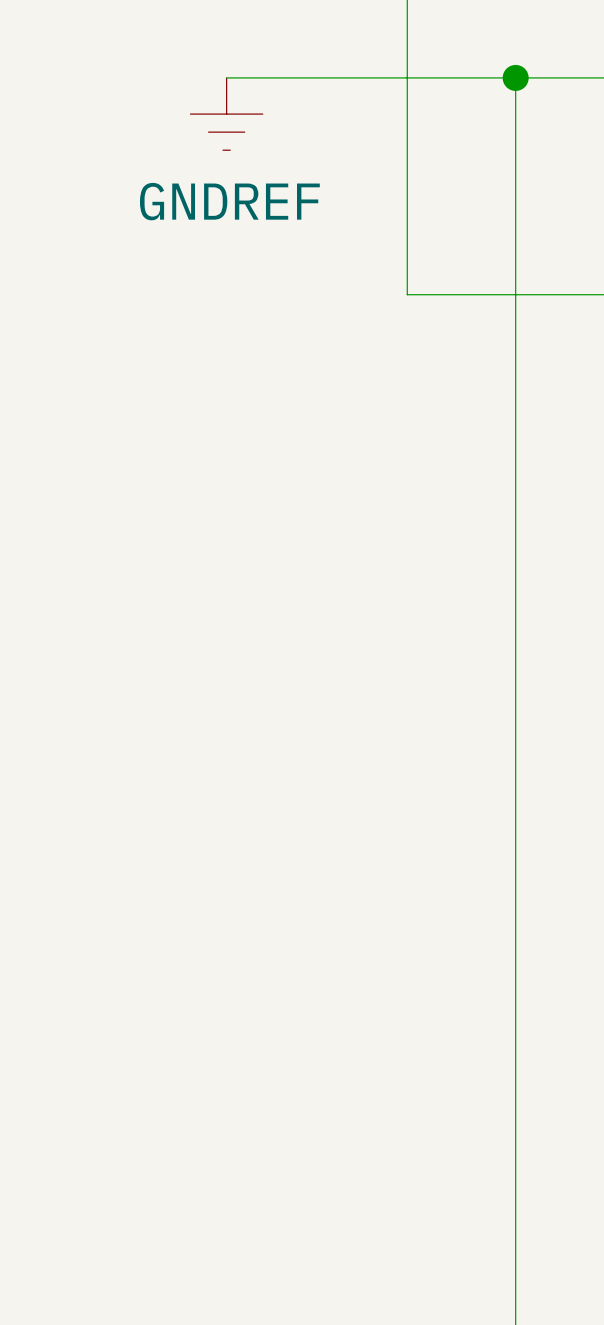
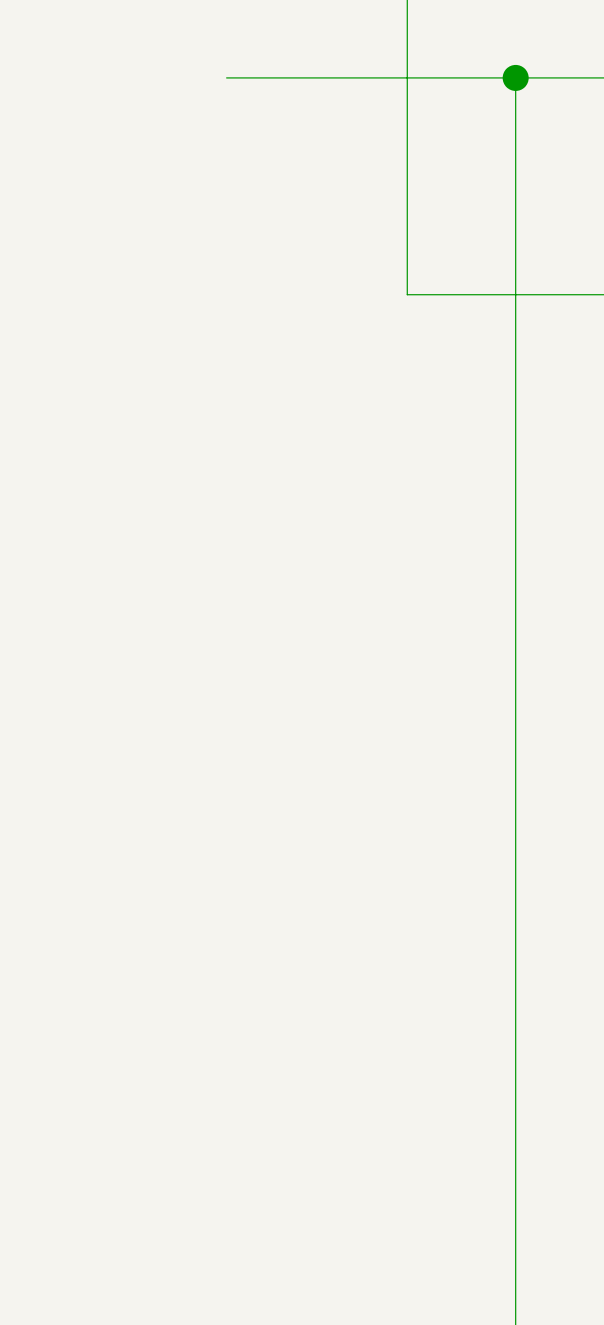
power symbol: GNDREF (226, 114) -> none

